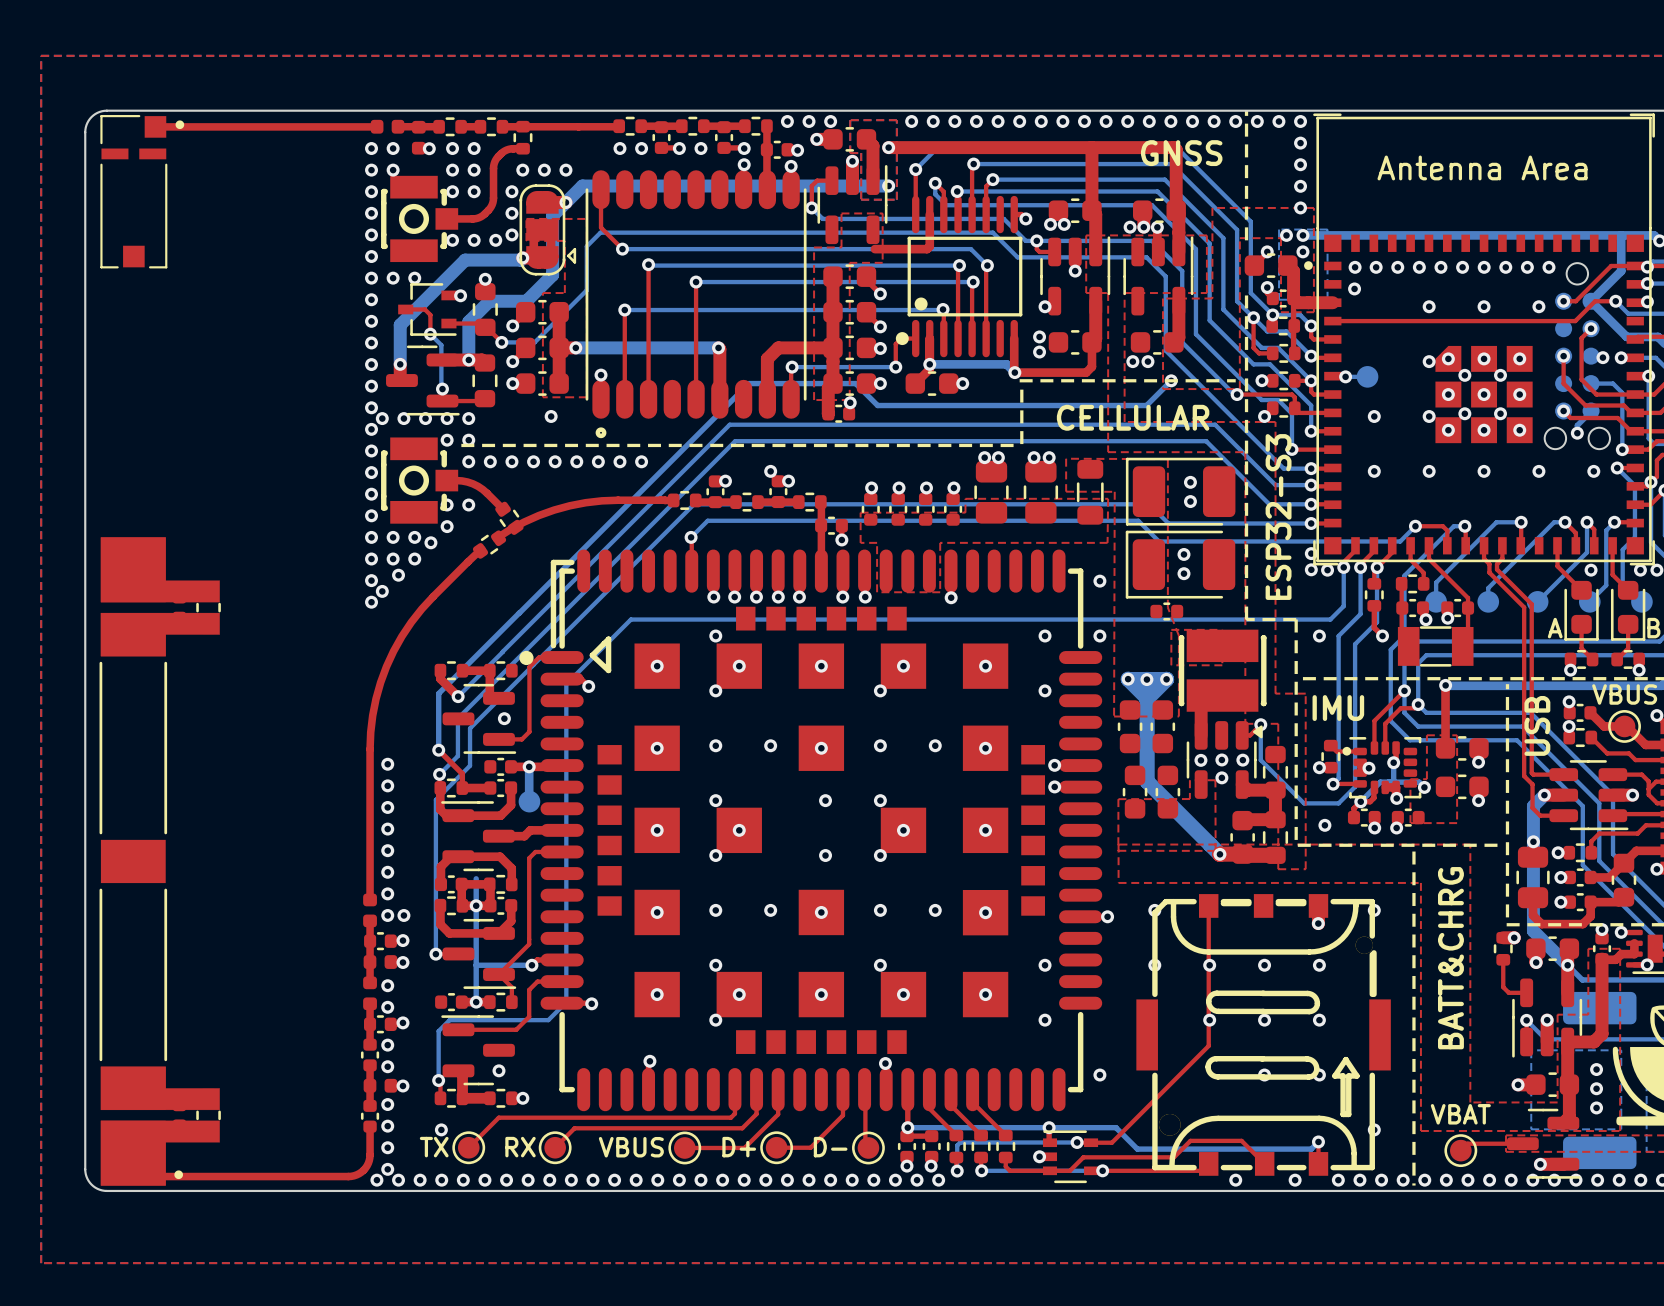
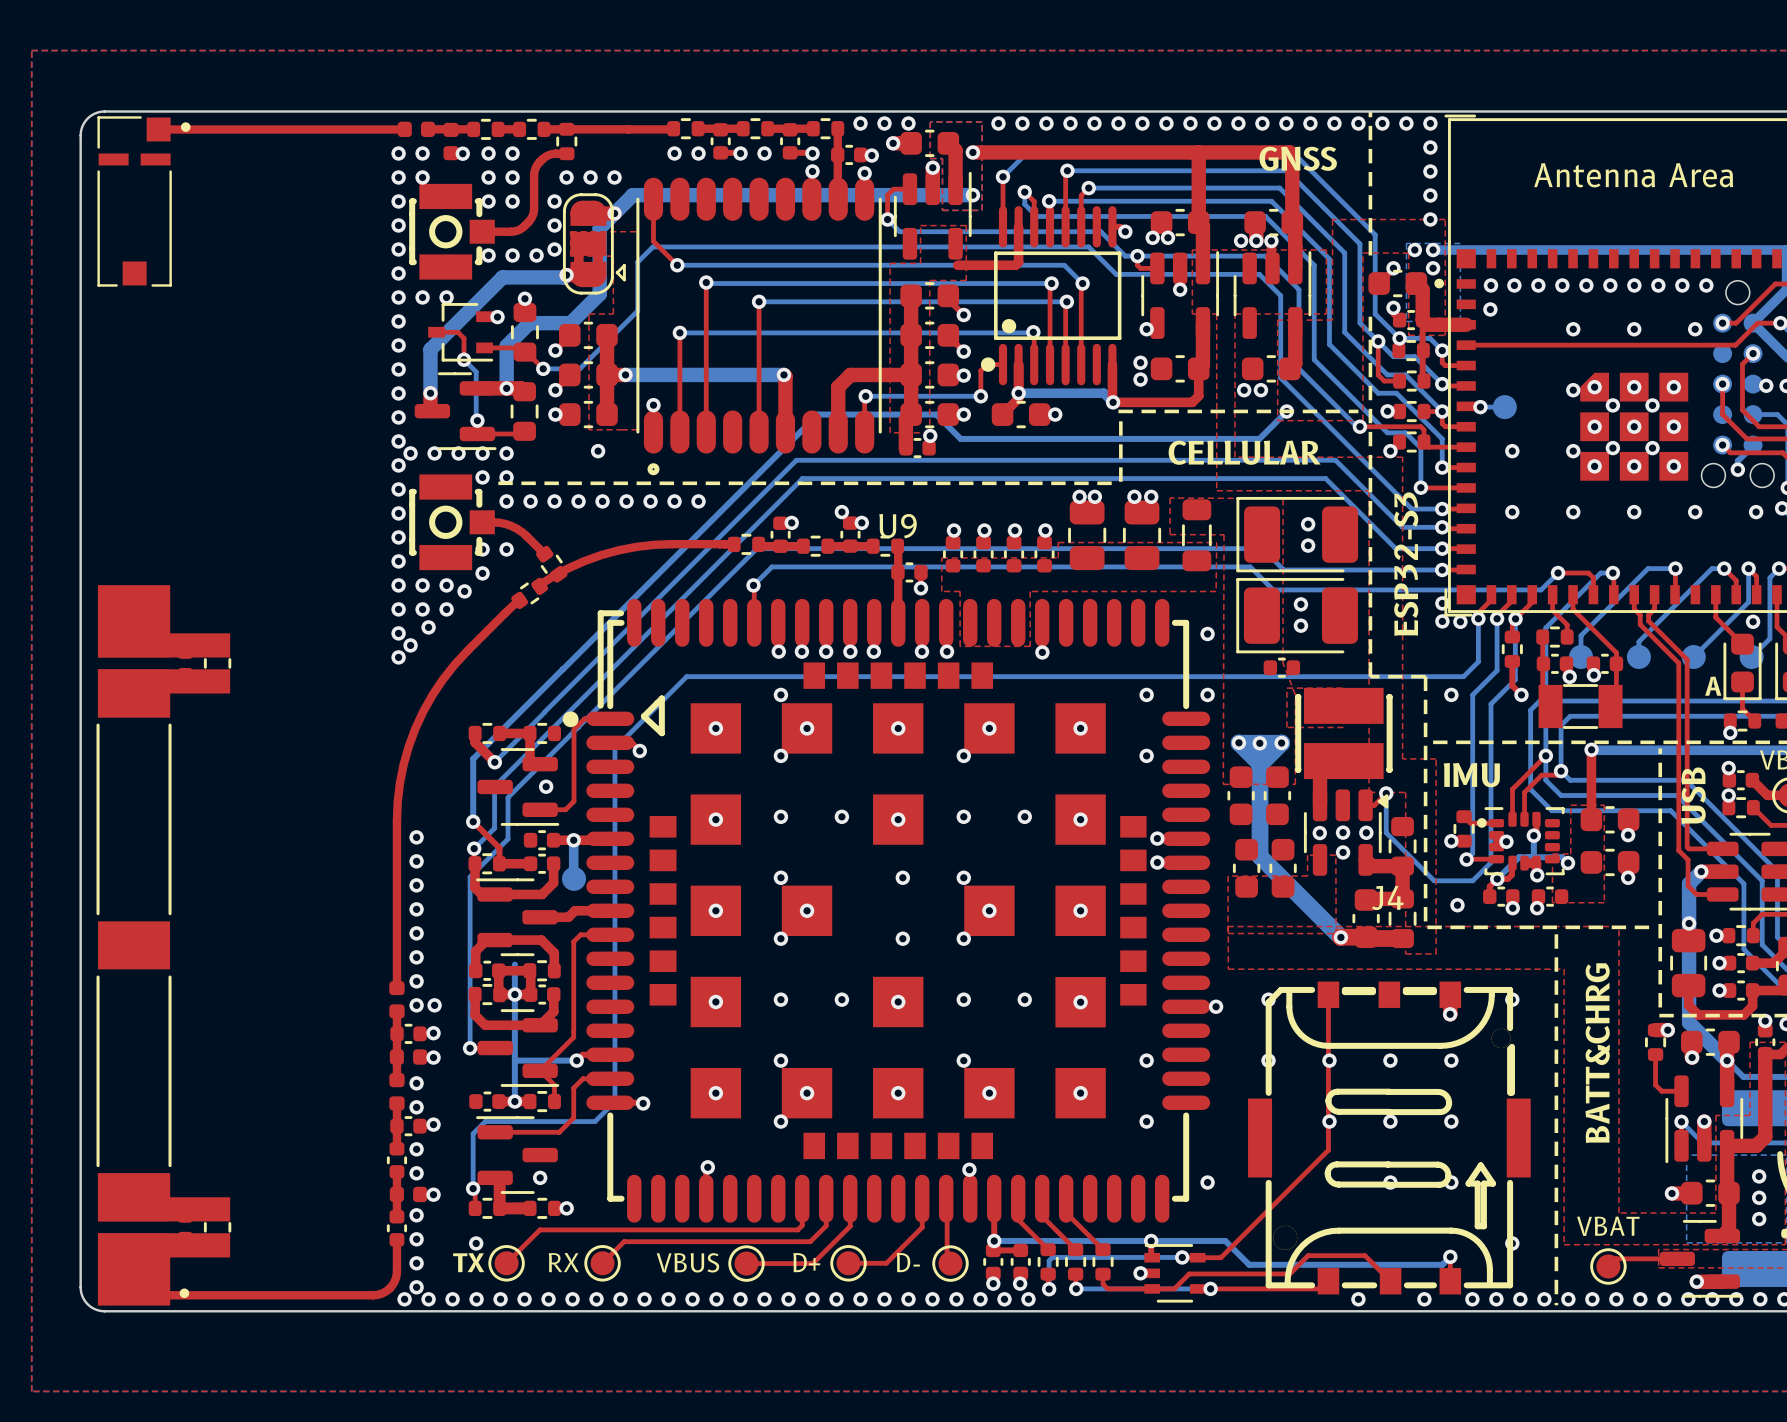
U9 name: none -> U9 (898, 526)
J4 name: none -> J4 (1387, 898)

